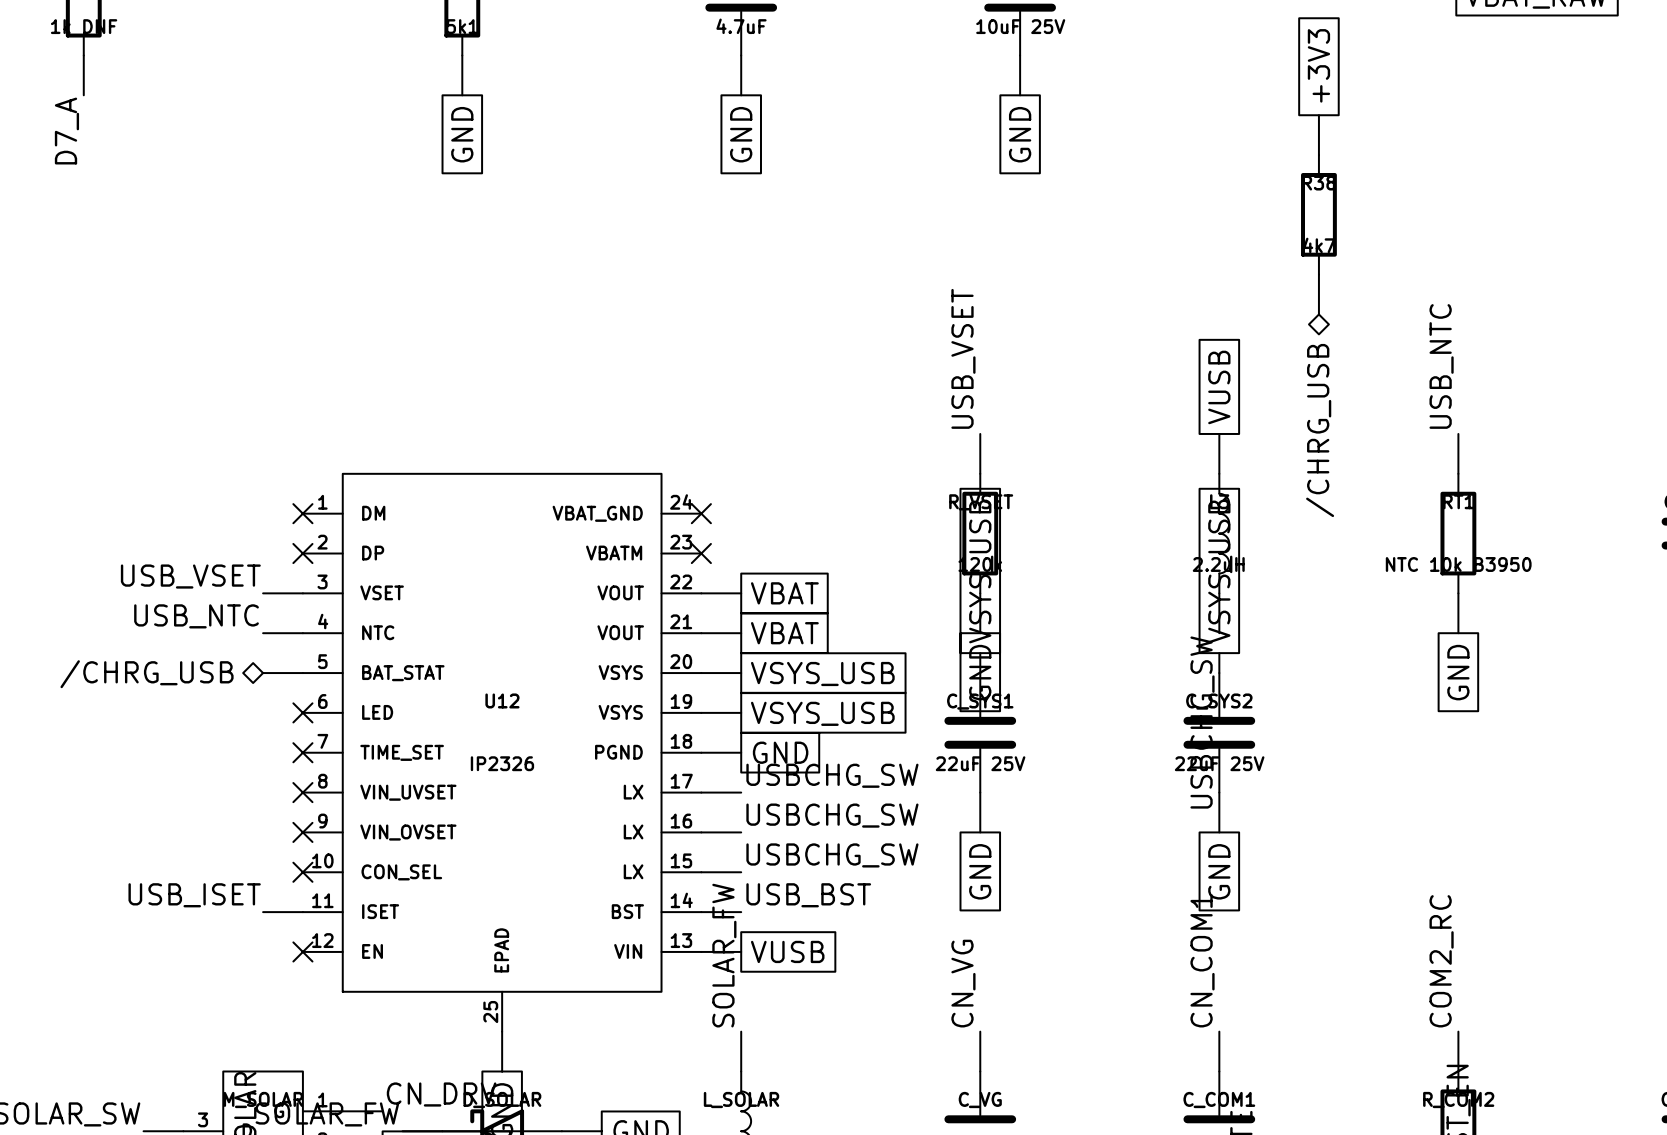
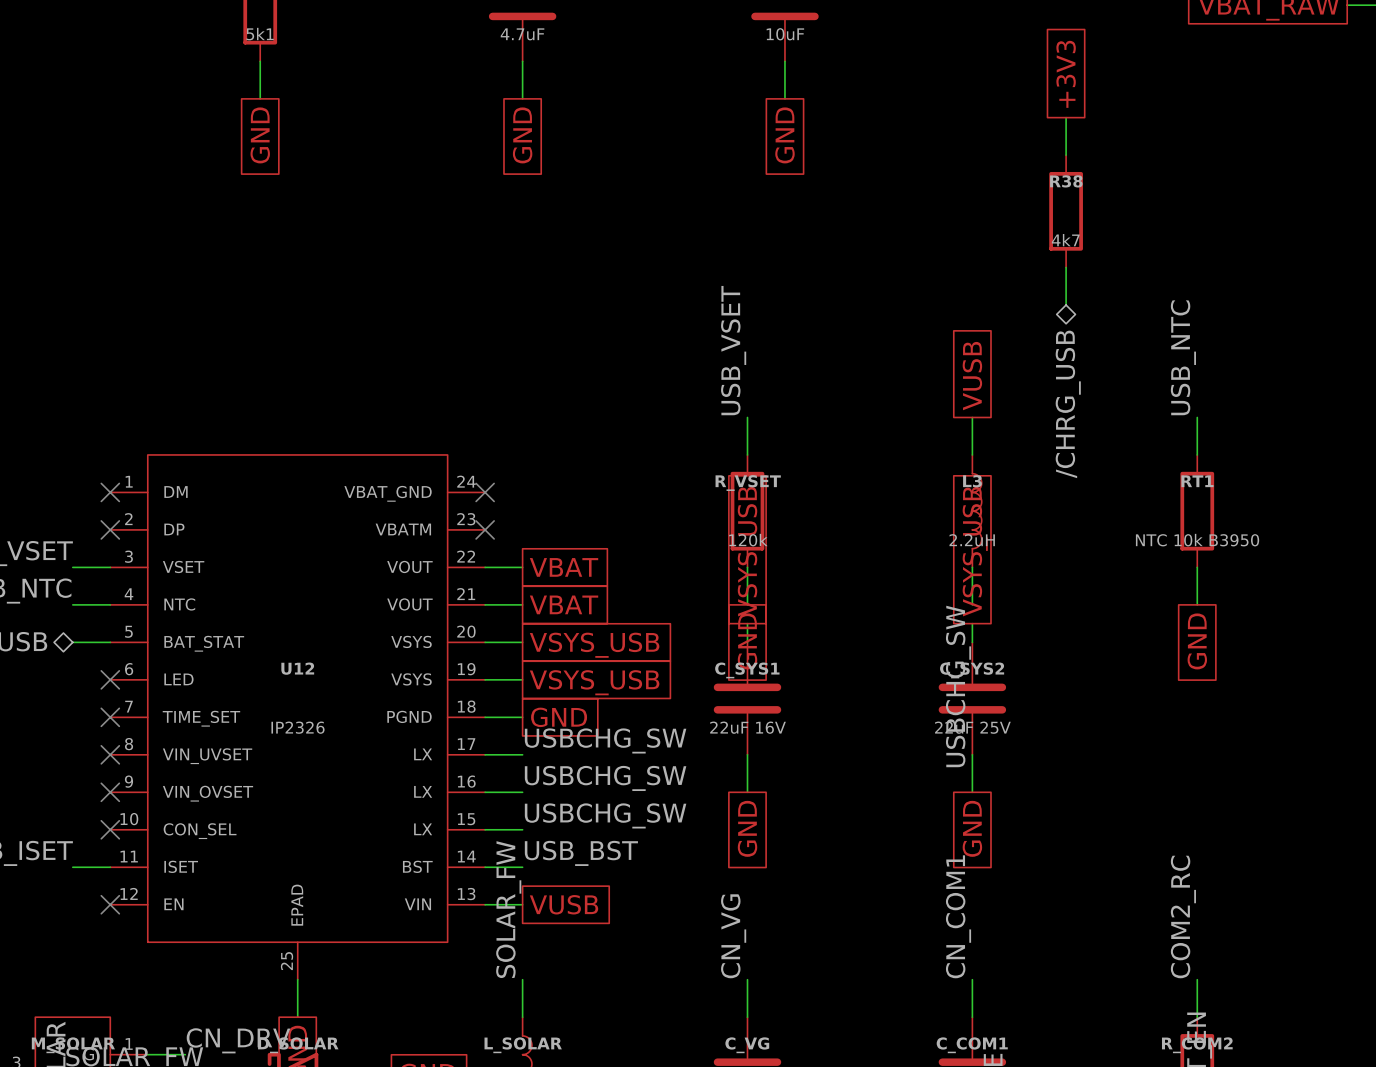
part value: 10uF 25V (1020, 26) -> 10uF (785, 34)
C_SYS1 value: 22uF 25V (980, 763) -> 22uF 16V (748, 727)

